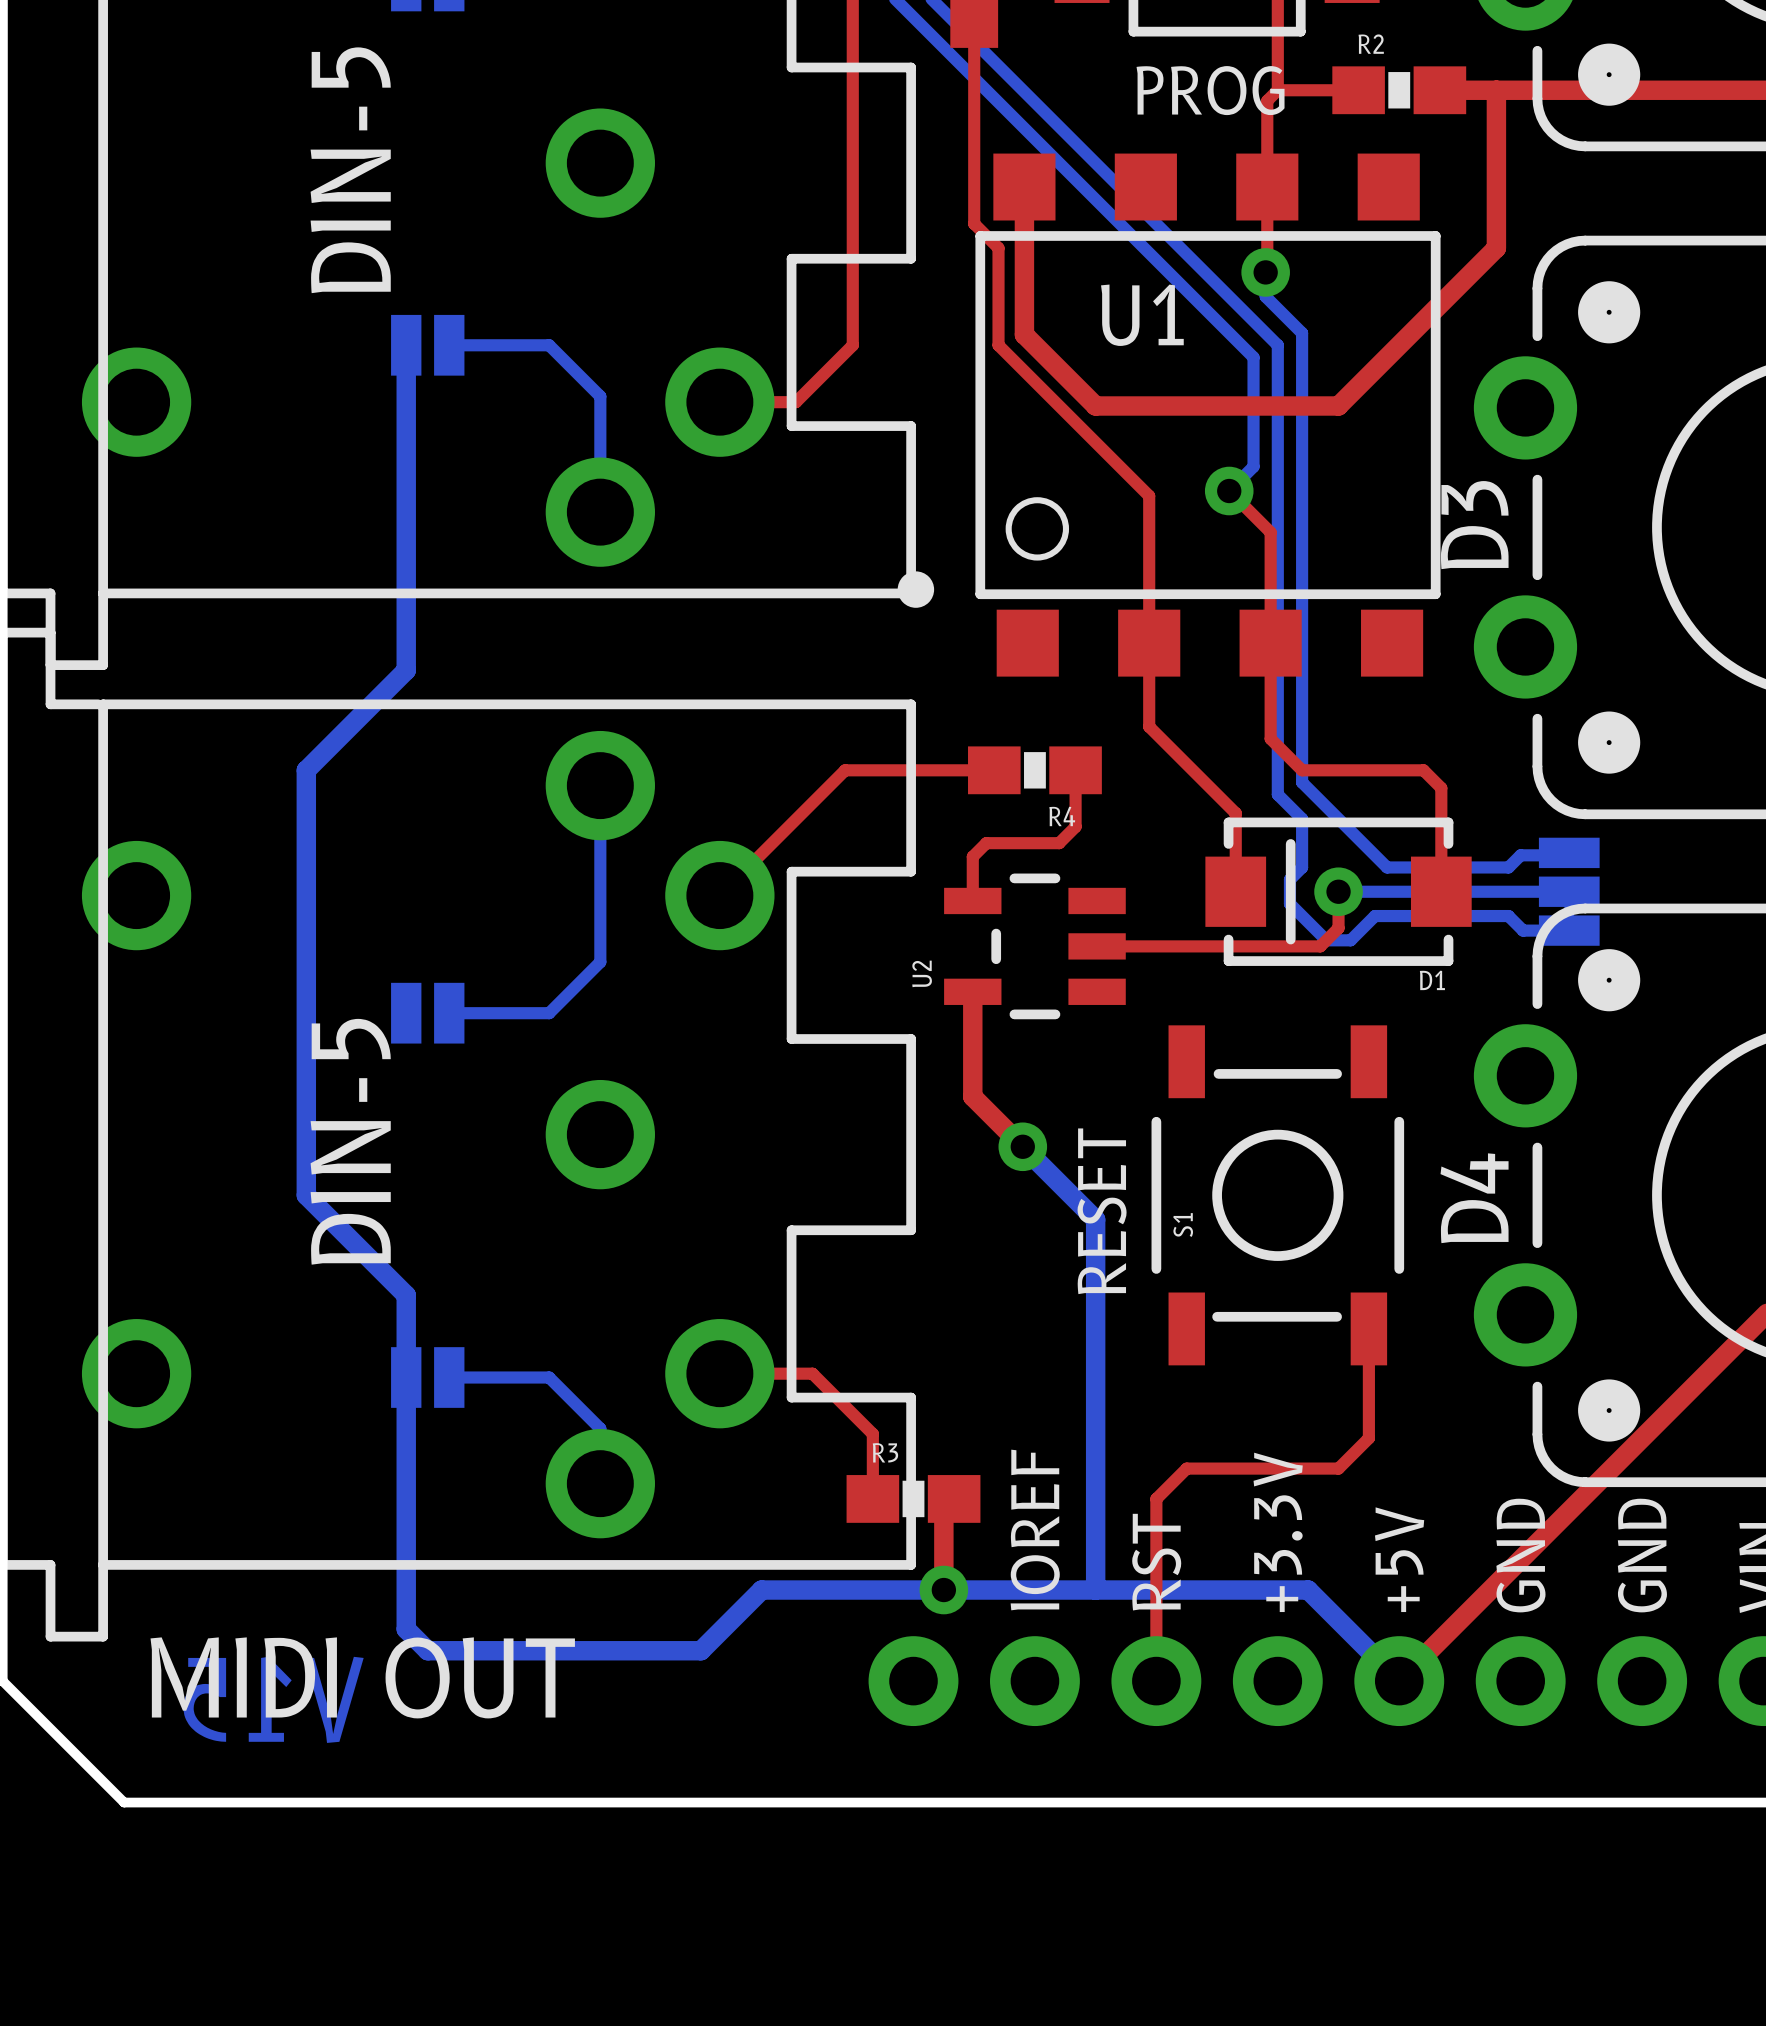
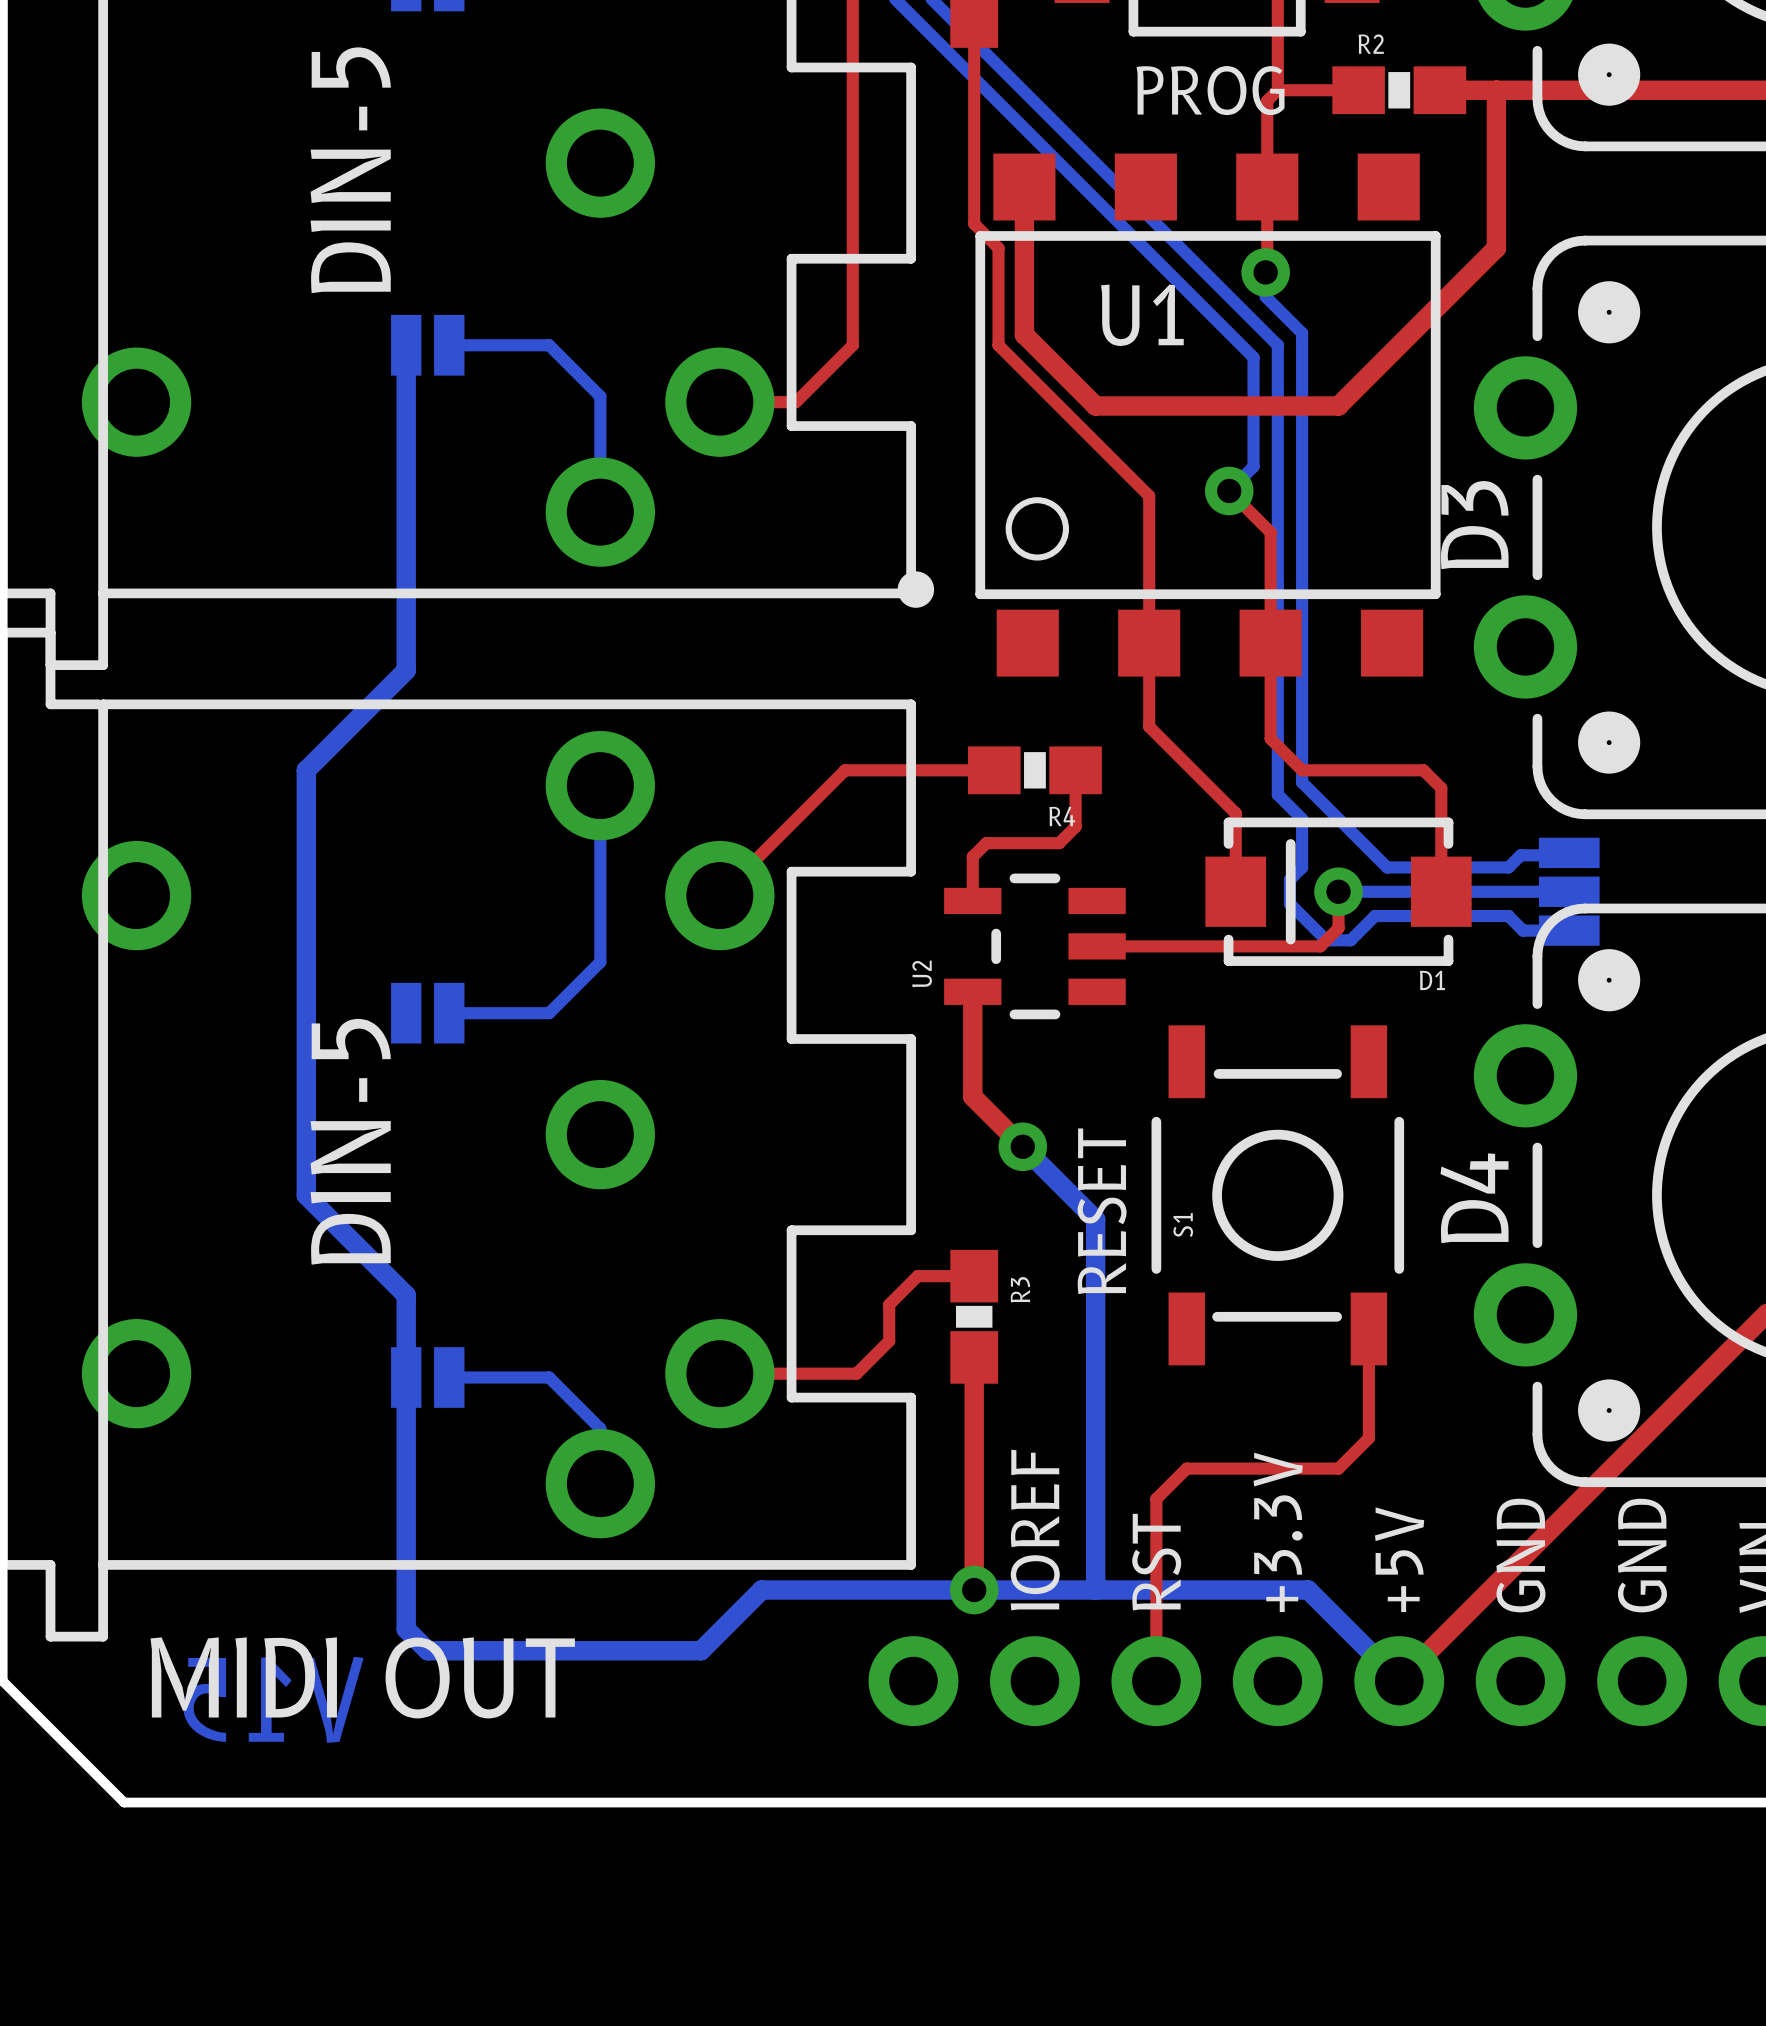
top track: none -> (974, 1357) (974, 1590)
top track: (812, 1373) (872, 1434) (872, 1498) -> (812, 1373) (856, 1373) (889, 1341) (889, 1304) (917, 1276) (974, 1276)
R3 rotation: 0° (913, 1498) -> 90° clockwise (974, 1316)
R3 position: (913, 1498) -> (974, 1316)
top track: (954, 1498) (943, 1498) (943, 1590) -> none
via position: (943, 1590) -> (974, 1590)

